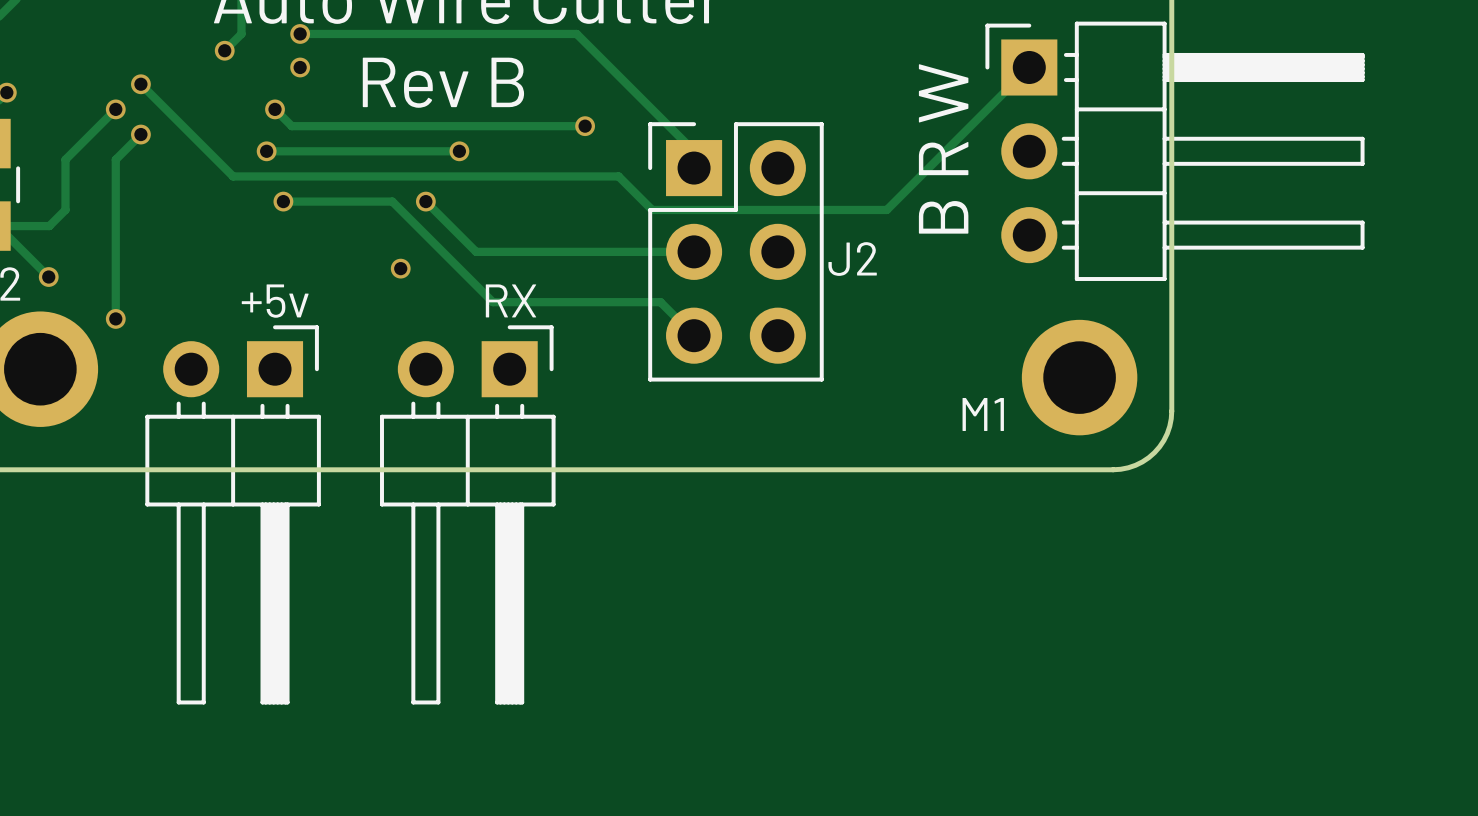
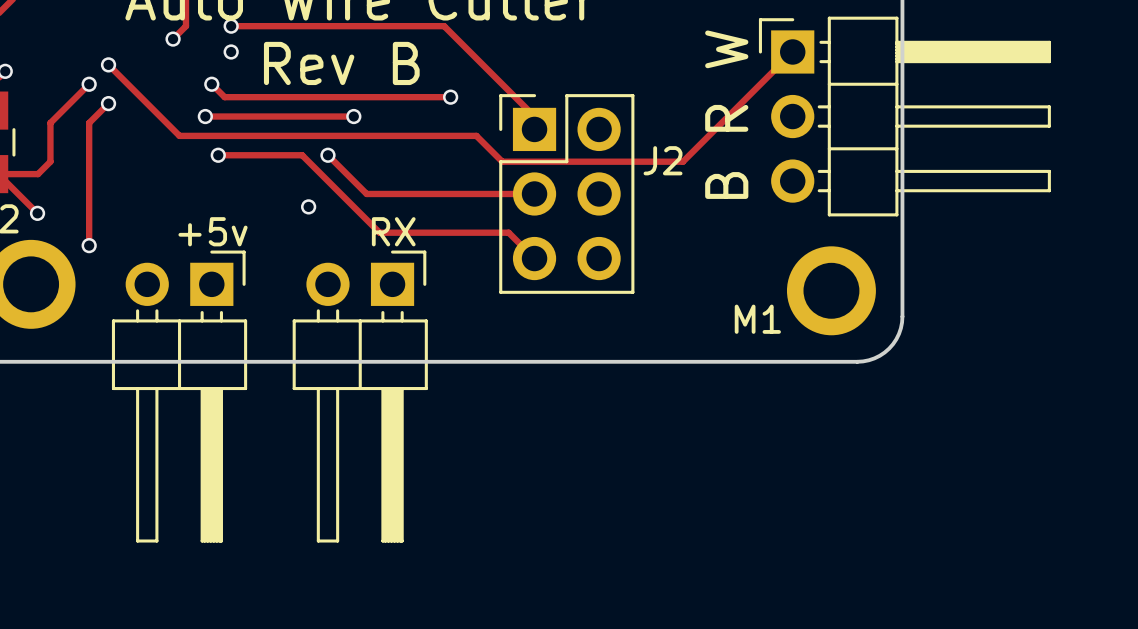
J2 name position: J2 (852, 259) -> J2 (663, 160)

